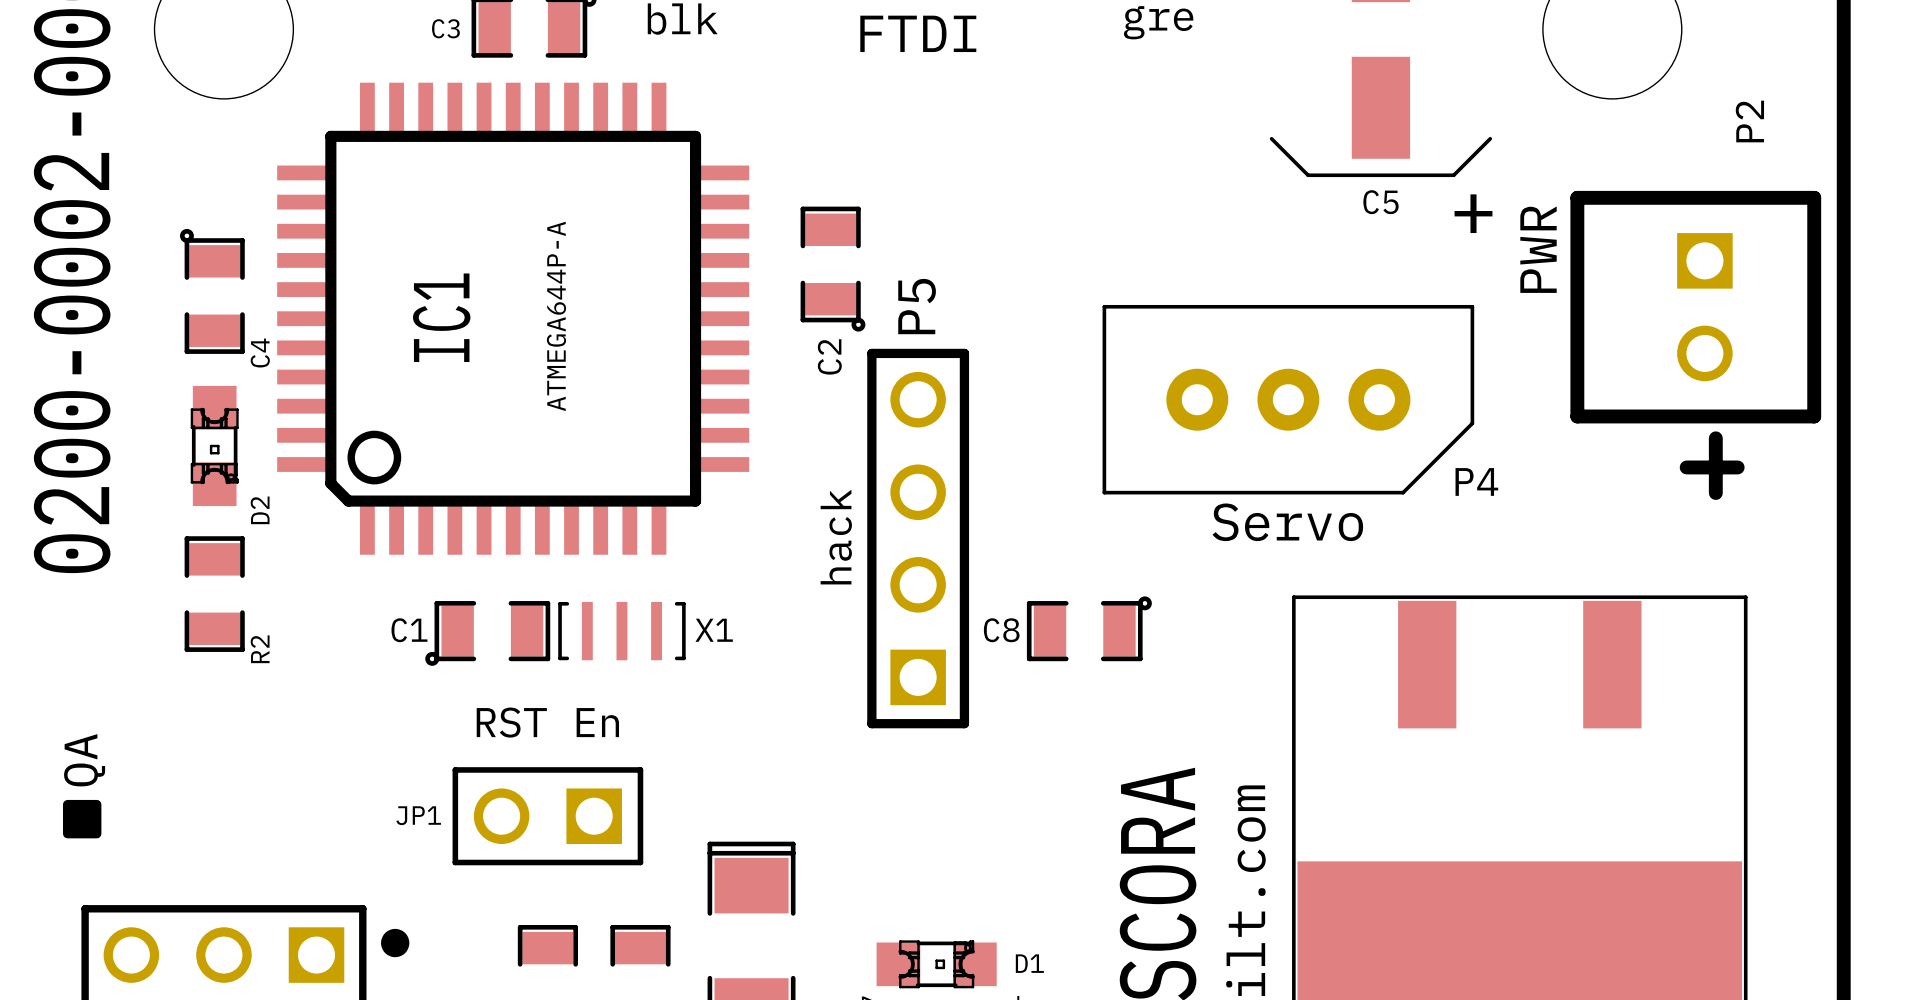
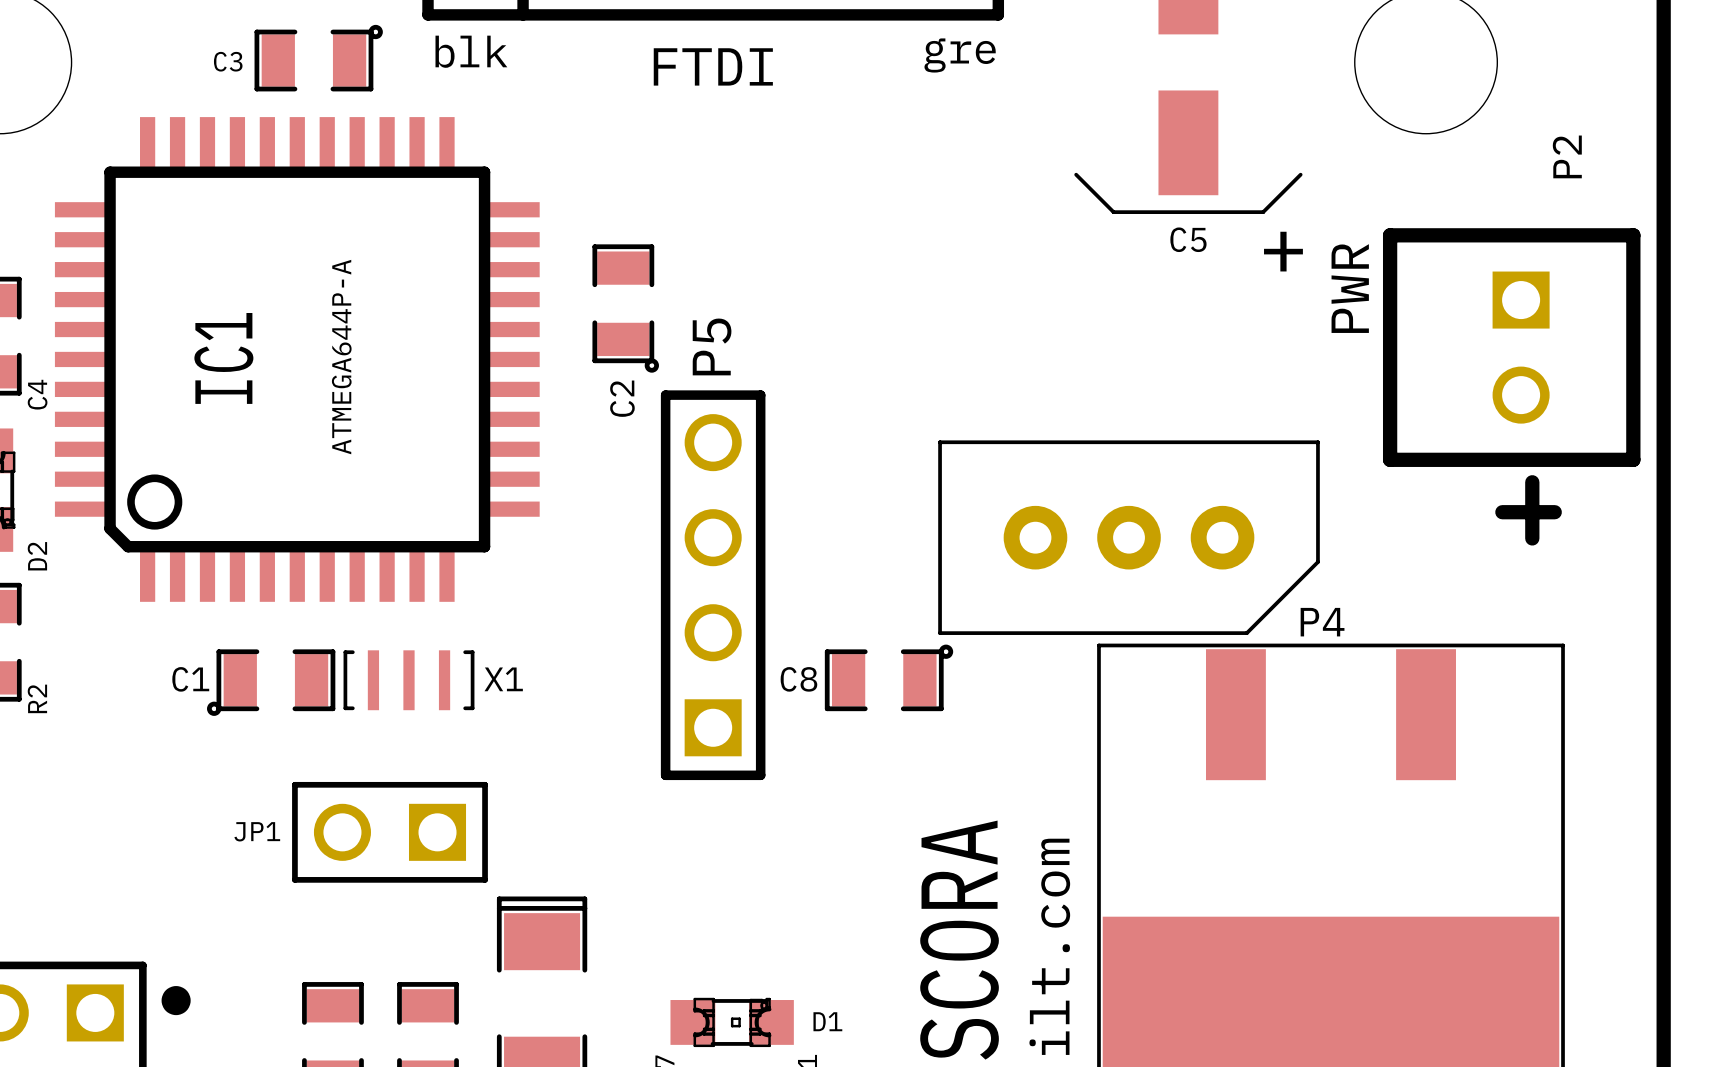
P4 position: (1288, 399) -> (1129, 537)
P4 text: Servo (1287, 522) -> none
P5 text: hack (836, 537) -> none
JP1 text: RST En (547, 722) -> none
JP1 position: (547, 816) -> (389, 832)

